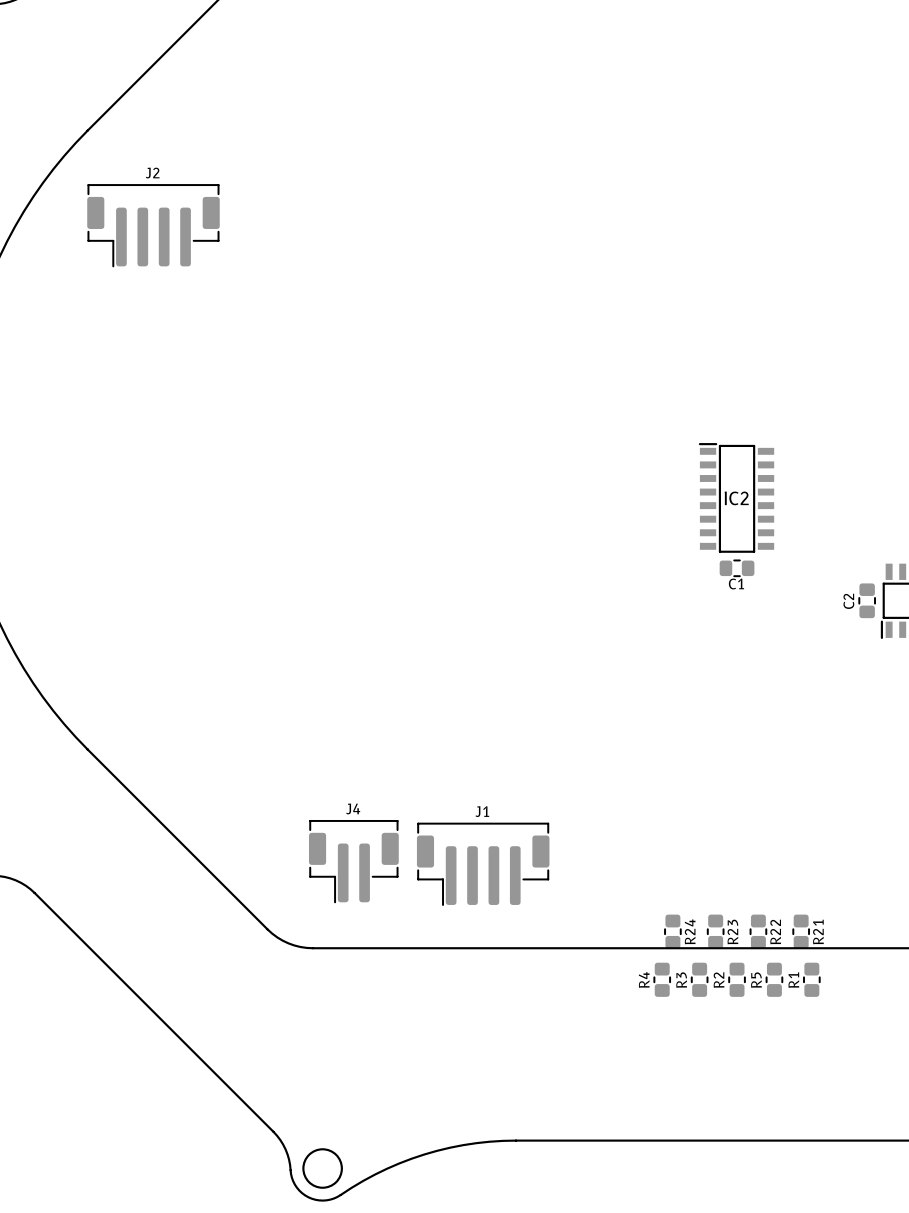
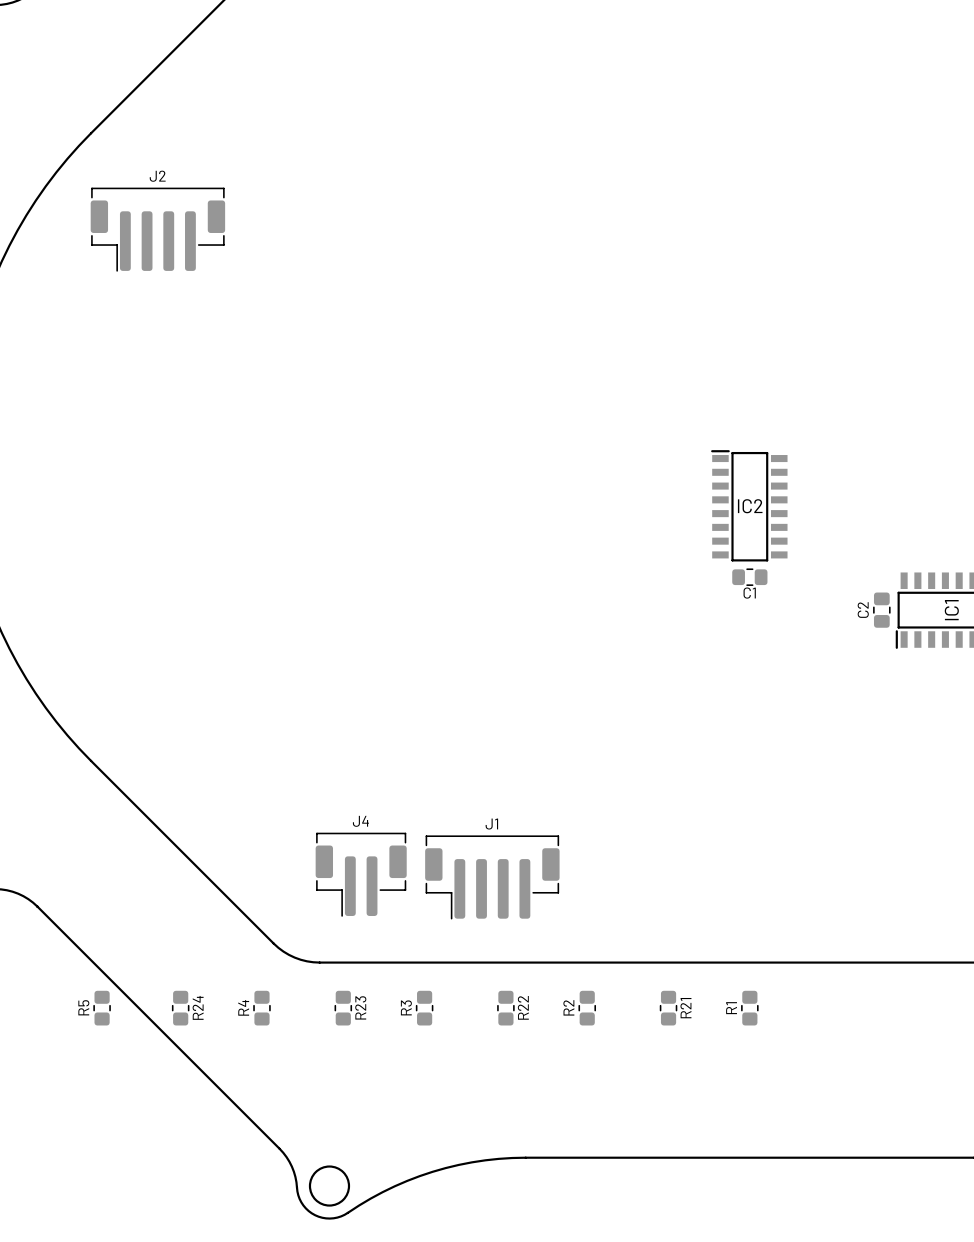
R24 position: (672, 931) -> (180, 1008)
R23 position: (715, 931) -> (343, 1008)
R22 position: (758, 931) -> (505, 1008)
R21 position: (801, 931) -> (668, 1008)
R4 position: (662, 979) -> (261, 1008)
R3 position: (699, 979) -> (424, 1008)
R2 position: (737, 979) -> (587, 1008)
R5 position: (774, 979) -> (102, 1008)
R1 position: (811, 979) -> (749, 1008)

